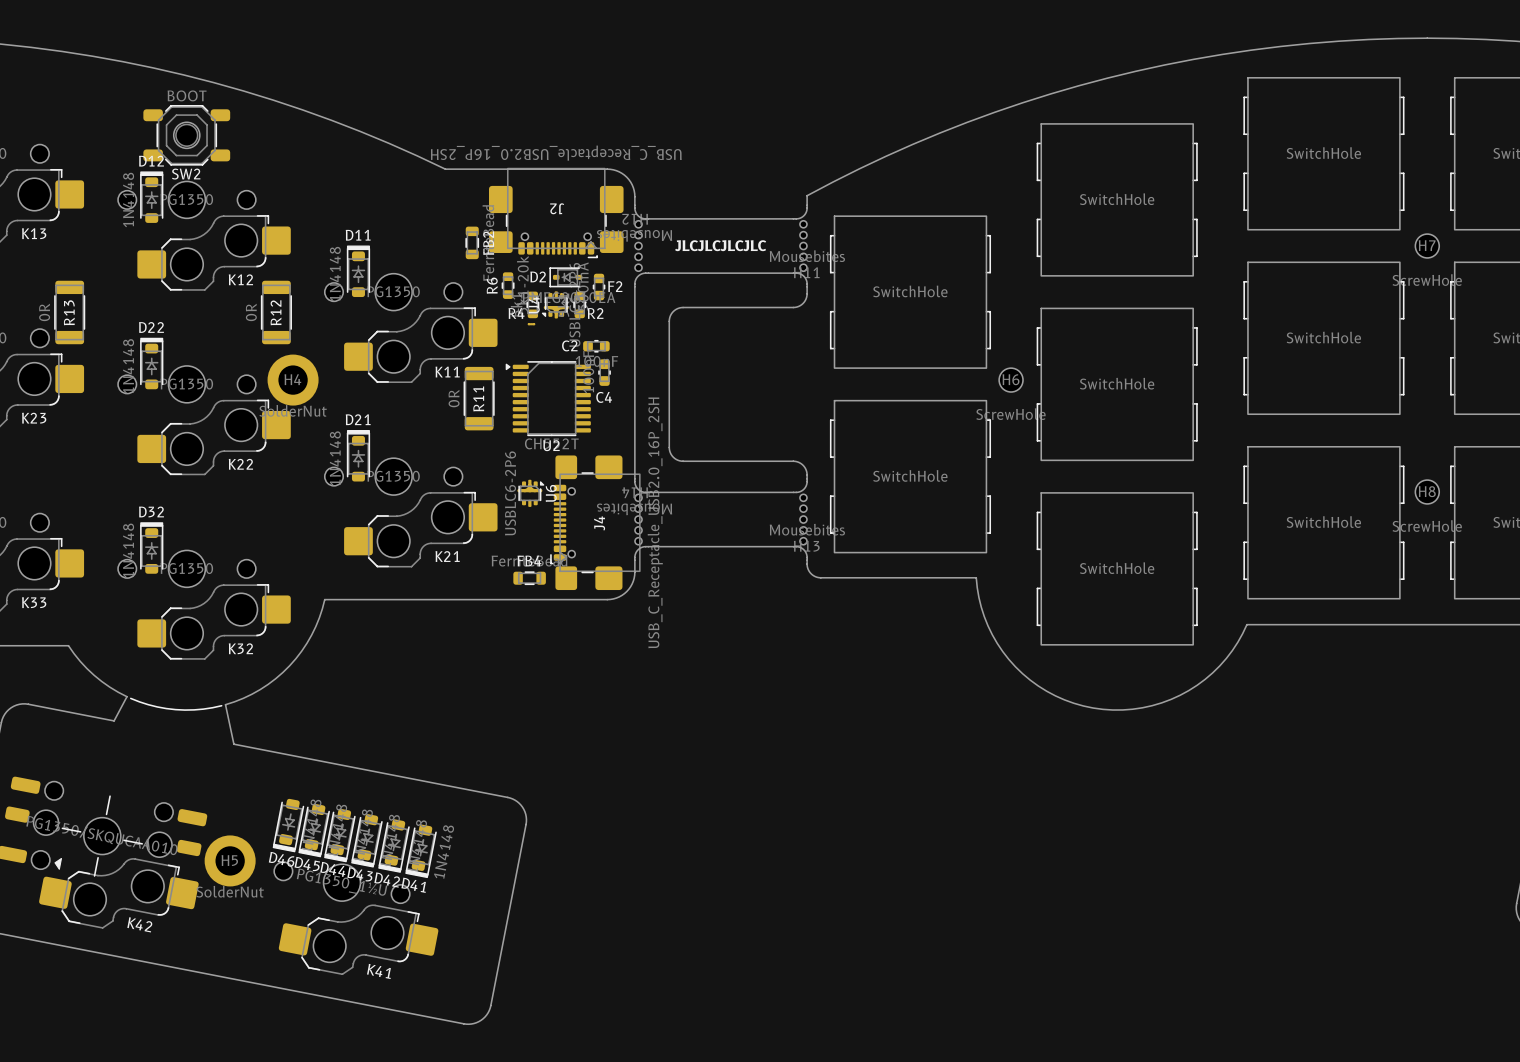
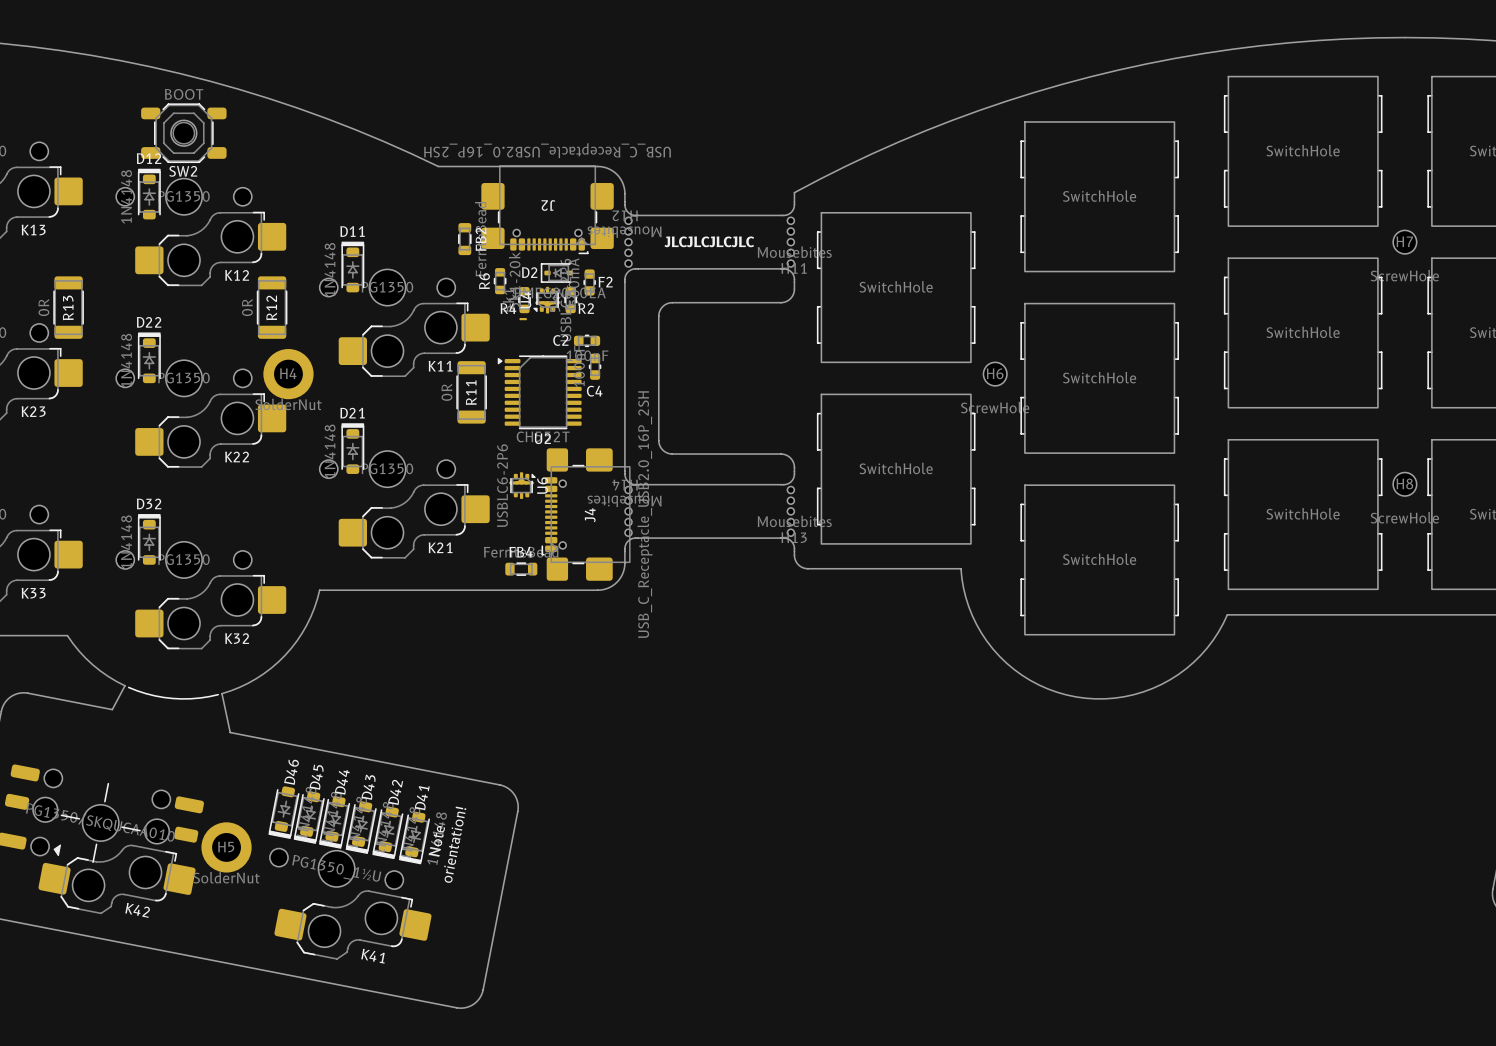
text: none -> Note (436, 841)
text: none -> orientation! (455, 844)
D46 name rotation: 0° (281, 859) -> 90° counterclockwise (291, 772)
D46 name position: D46 (281, 859) -> D46 (291, 772)
D45 name rotation: 0° (307, 864) -> 90° counterclockwise (316, 777)
D45 name position: D45 (307, 864) -> D45 (316, 777)
D44 name rotation: 0° (332, 869) -> 90° counterclockwise (342, 782)
D44 name position: D44 (332, 869) -> D44 (342, 782)
D43 name rotation: 0° (360, 874) -> 90° counterclockwise (368, 787)
D43 name position: D43 (360, 874) -> D43 (368, 787)
D42 name rotation: 0° (387, 880) -> 90° counterclockwise (395, 792)
D42 name position: D42 (387, 880) -> D42 (395, 792)
D41 name rotation: 0° (413, 885) -> 90° counterclockwise (422, 798)
D41 name position: D41 (413, 885) -> D41 (422, 798)

